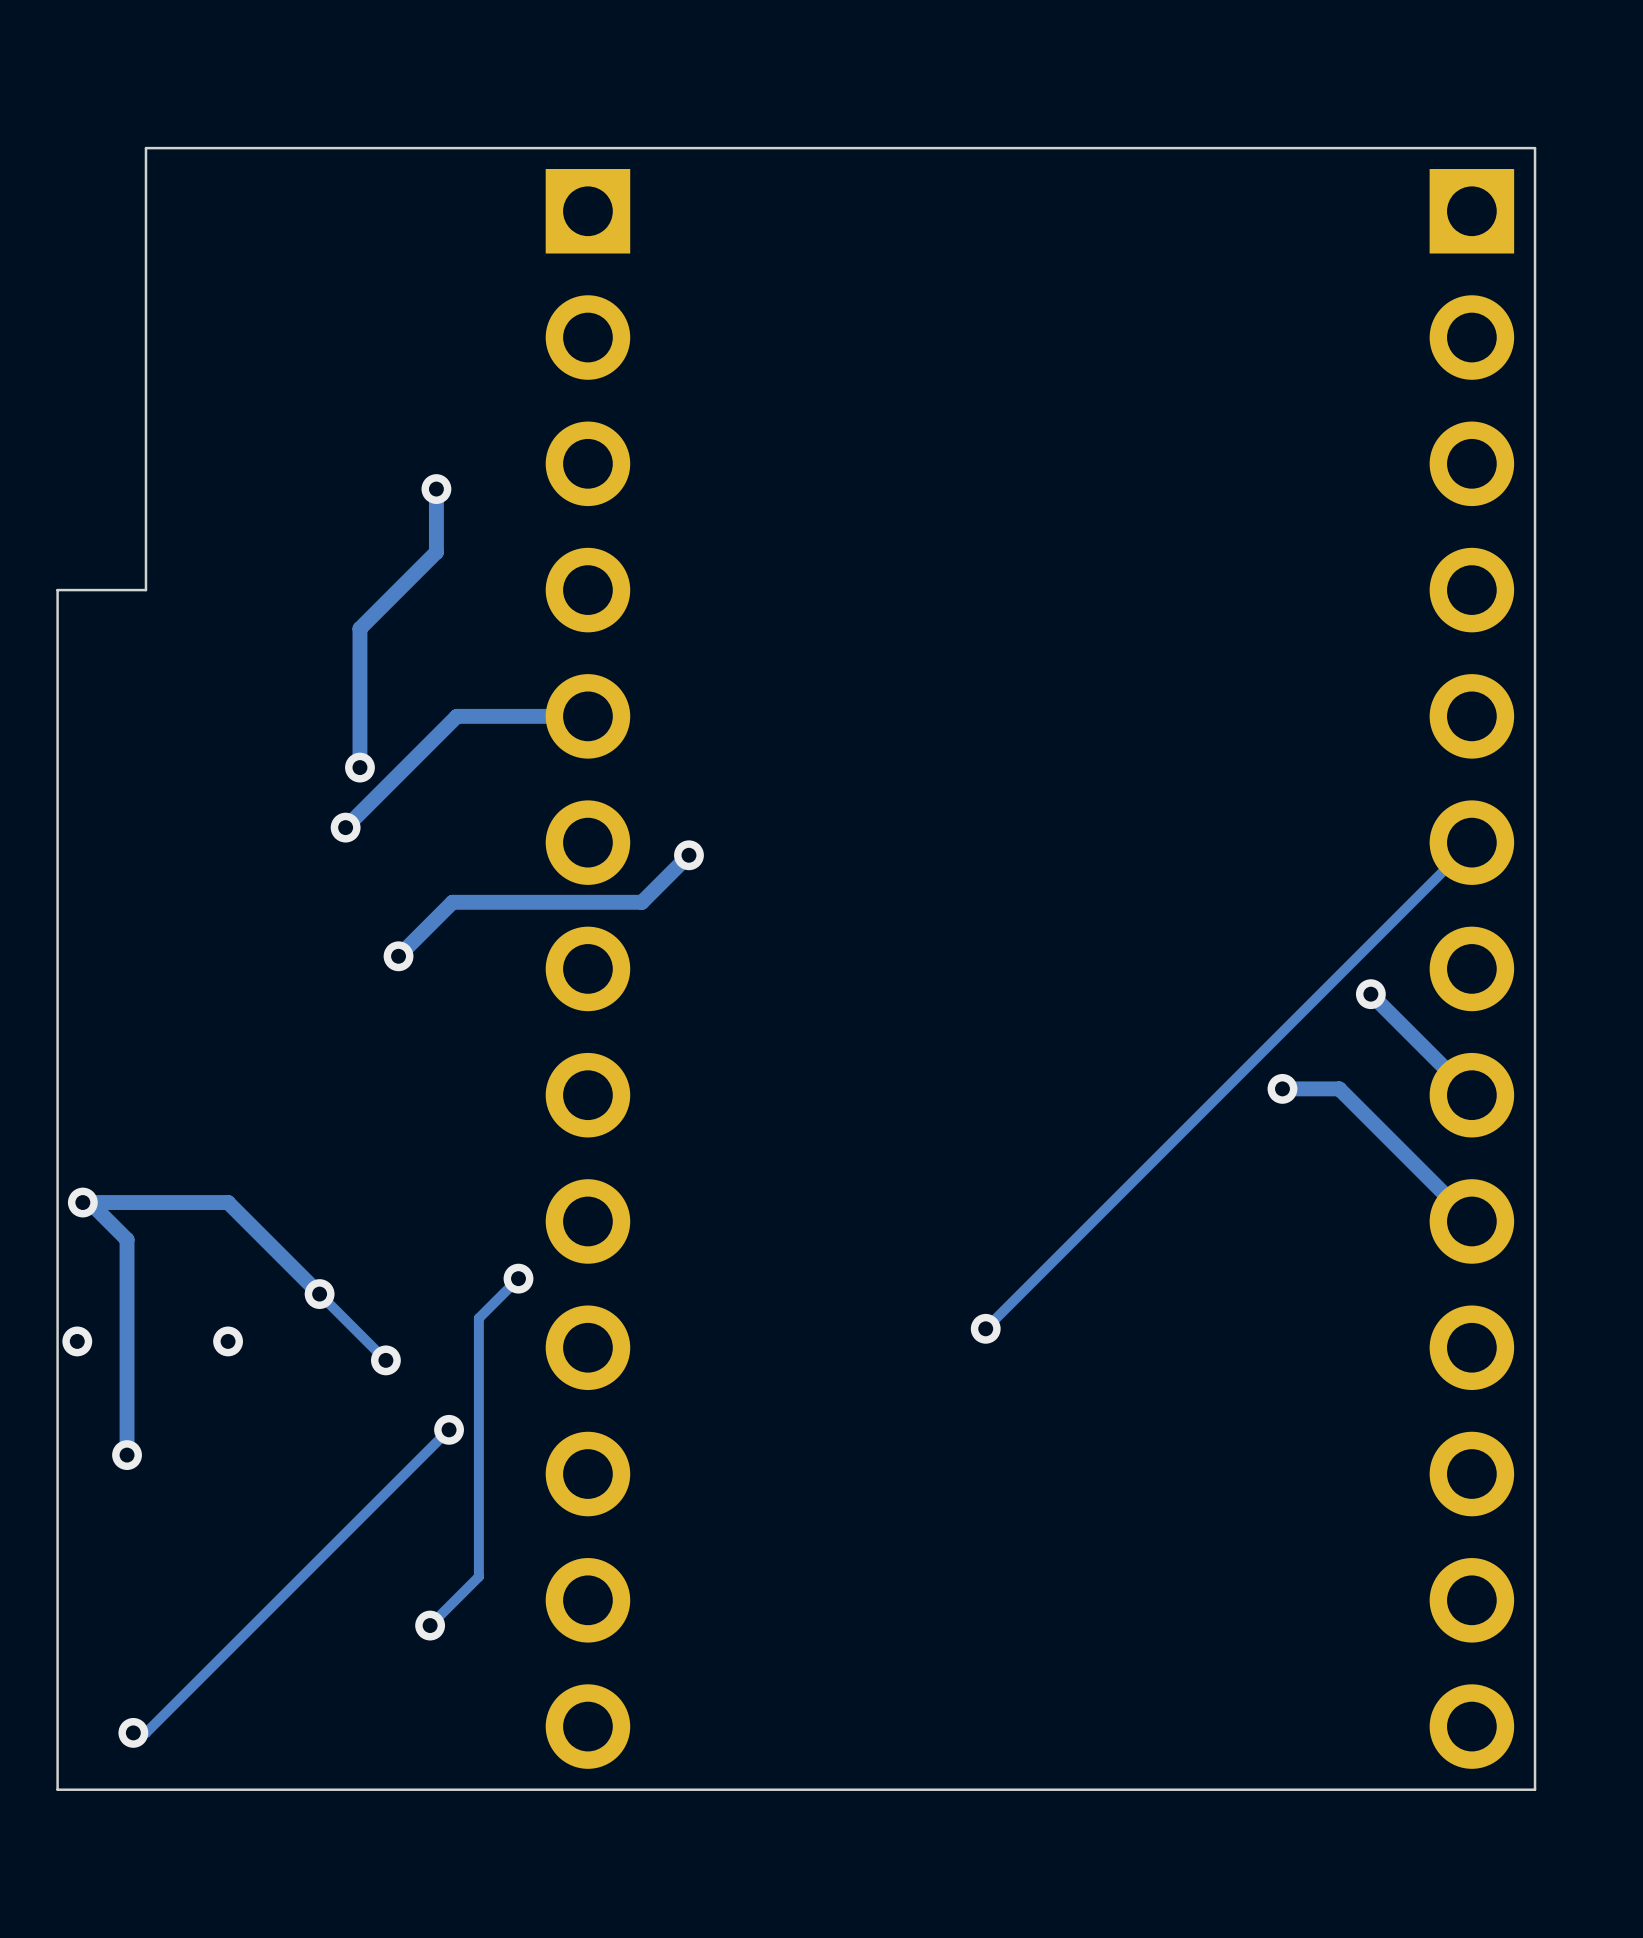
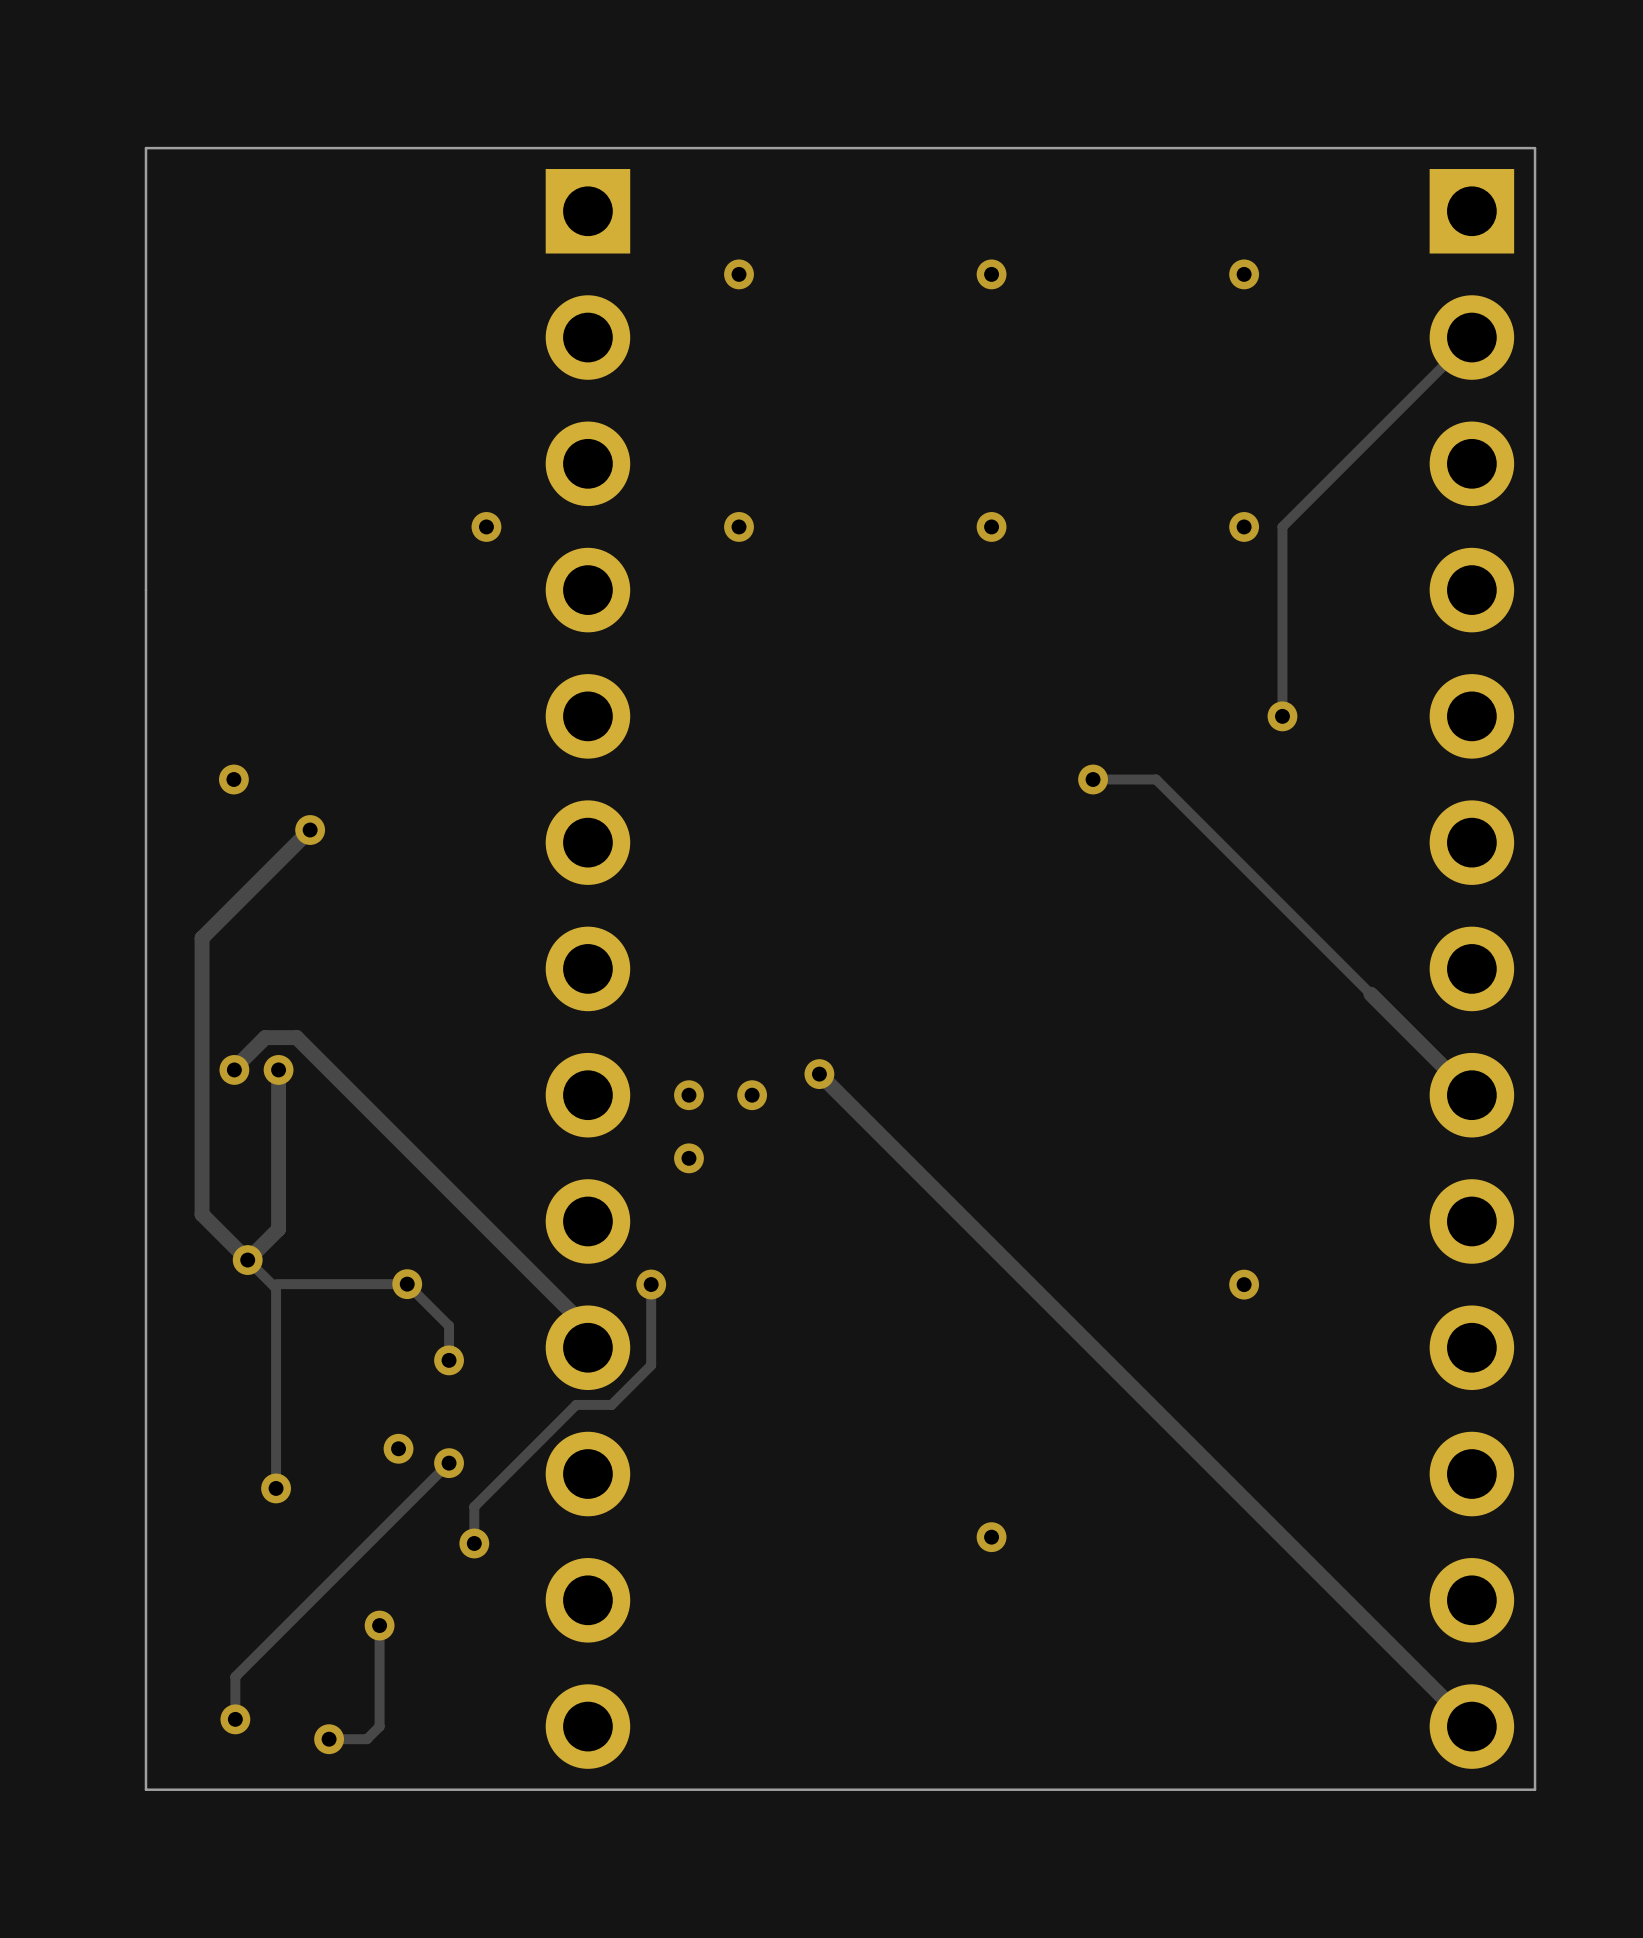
via: none -> (739, 274)
via: none -> (991, 274)
via: none -> (1244, 274)
track: none -> (1471, 337) (1282, 526) (1282, 716)
track: (436, 489) (436, 552) (359, 628) (359, 767) -> none
via position: (436, 489) -> (486, 526)
via: none -> (739, 526)
via: none -> (991, 526)
via: none -> (1244, 526)
board edge: (145, 590) (57, 590) (57, 1789) (145, 1789) -> (145, 590) (145, 1789)
track: (587, 716) (456, 716) (345, 827) -> none
via: none -> (1282, 716)
via: (359, 767) -> none
via: none -> (233, 779)
track: none -> (1093, 779) (1156, 779) (1370, 994)
via: none -> (1093, 779)
via position: (345, 827) -> (310, 830)
track: none -> (310, 830) (202, 938) (202, 1214) (247, 1260)
track: (1471, 842) (985, 1328) -> none
track: (688, 855) (641, 902) (452, 902) (398, 956) -> none
via: (688, 855) -> none
via: (398, 956) -> none
via: (1370, 994) -> none
track: none -> (234, 1069) (265, 1037) (296, 1037) (587, 1328) (587, 1347)
via: none -> (234, 1069)
track: none -> (278, 1069) (278, 1229) (247, 1260)
via: none -> (278, 1069)
track: none -> (819, 1074) (1471, 1726)
via: none -> (819, 1074)
track: (1282, 1088) (1339, 1088) (1471, 1221) -> none
via: (1282, 1088) -> none
via: none -> (688, 1095)
via: none -> (752, 1095)
via: none -> (688, 1158)
track: (82, 1202) (228, 1202) (385, 1360) -> none
via: (82, 1202) -> none
track: (89, 1202) (127, 1239) (127, 1455) -> none
track: none -> (247, 1260) (276, 1288) (276, 1488)
via: none -> (247, 1260)
track: (518, 1278) (478, 1318) (478, 1576) (430, 1625) -> none
via: (518, 1278) -> none
track: none -> (276, 1284) (407, 1284) (449, 1325) (449, 1360)
via: none -> (407, 1284)
track: none -> (651, 1284) (651, 1365) (611, 1404) (576, 1404) (474, 1506) (474, 1543)
via: none -> (651, 1284)
via: none -> (1244, 1284)
via: (319, 1294) -> none
via: (985, 1328) -> none
via: (77, 1341) -> none
via: (228, 1341) -> none
via: (385, 1360) -> none
via: none -> (449, 1360)
track: (449, 1429) (145, 1732) (133, 1732) -> none
via: (449, 1429) -> none
via: none -> (398, 1448)
via: (127, 1455) -> none
track: none -> (449, 1463) (235, 1676) (235, 1719)
via: none -> (449, 1463)
via: none -> (276, 1488)
via: none -> (991, 1537)
via: none -> (474, 1543)
track: none -> (379, 1625) (379, 1726) (366, 1739) (329, 1739)
via: none -> (379, 1625)
via: (430, 1625) -> none
via: none -> (235, 1719)
via: (133, 1732) -> none
via: none -> (329, 1739)

